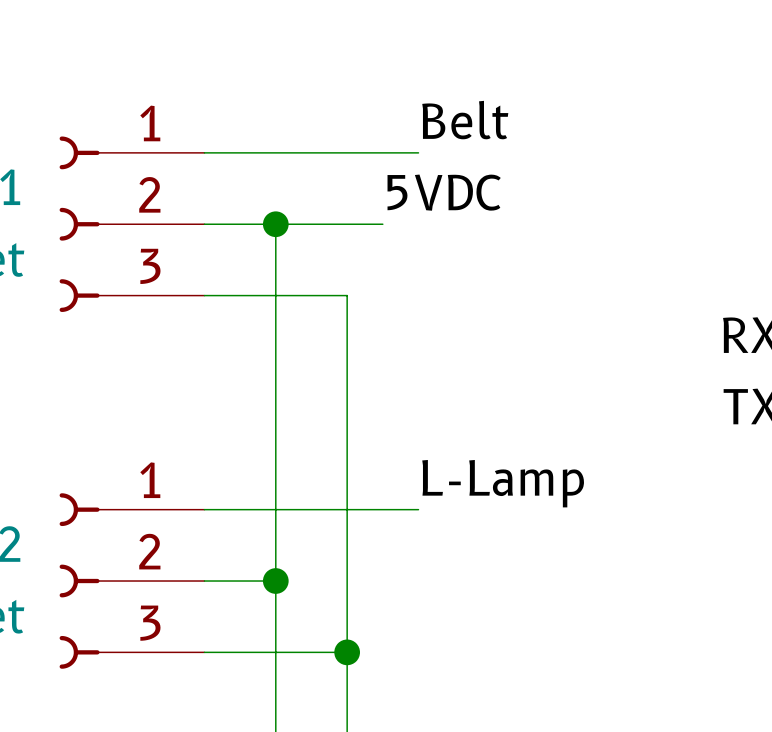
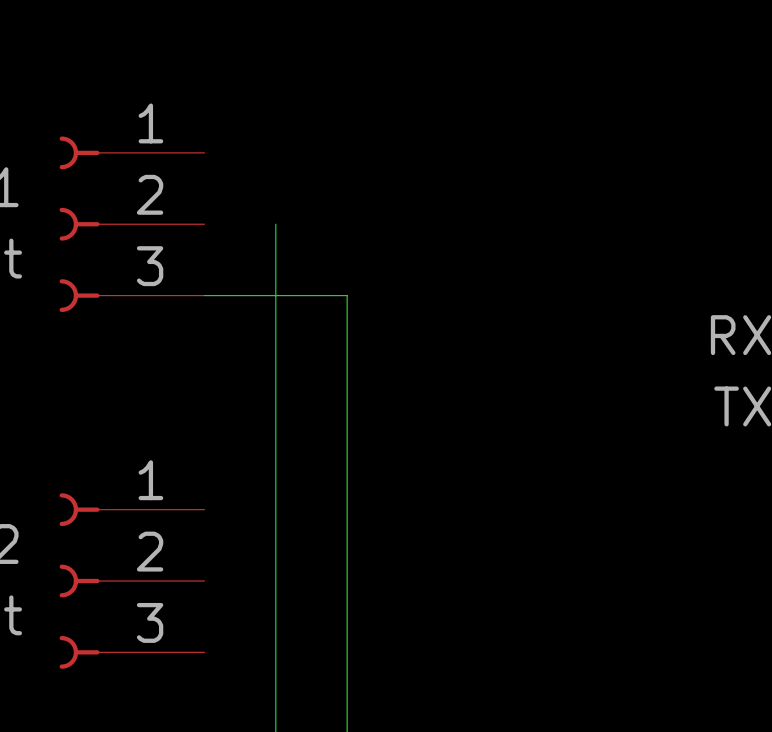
label: Belt (465, 120) -> none
wire: (204, 152) (418, 152) -> none
label: 5VDC (444, 192) -> none
wire: (204, 224) (382, 224) -> none
junction: (275, 224) -> none
label: L-Lamp (503, 483) -> none
wire: (204, 509) (418, 509) -> none
wire: (204, 581) (275, 581) -> none
junction: (275, 581) -> none
wire: (204, 652) (347, 652) -> none
junction: (347, 652) -> none

